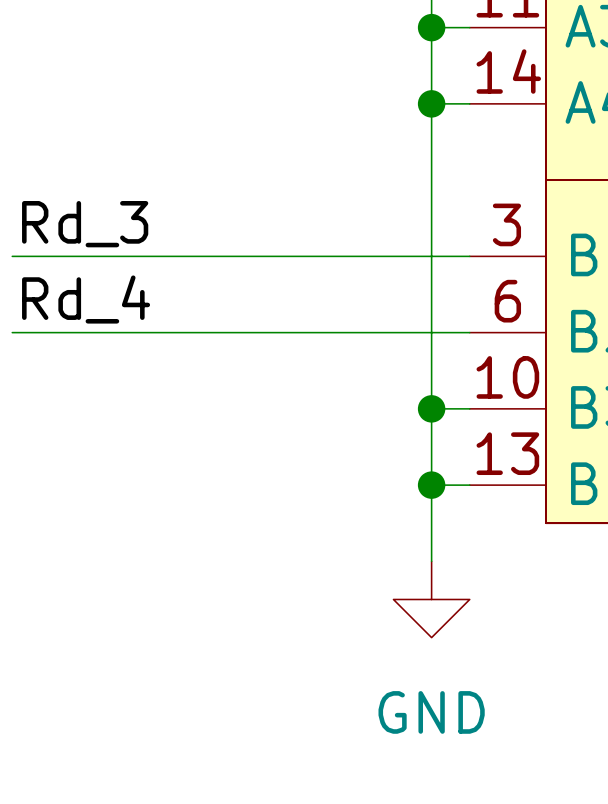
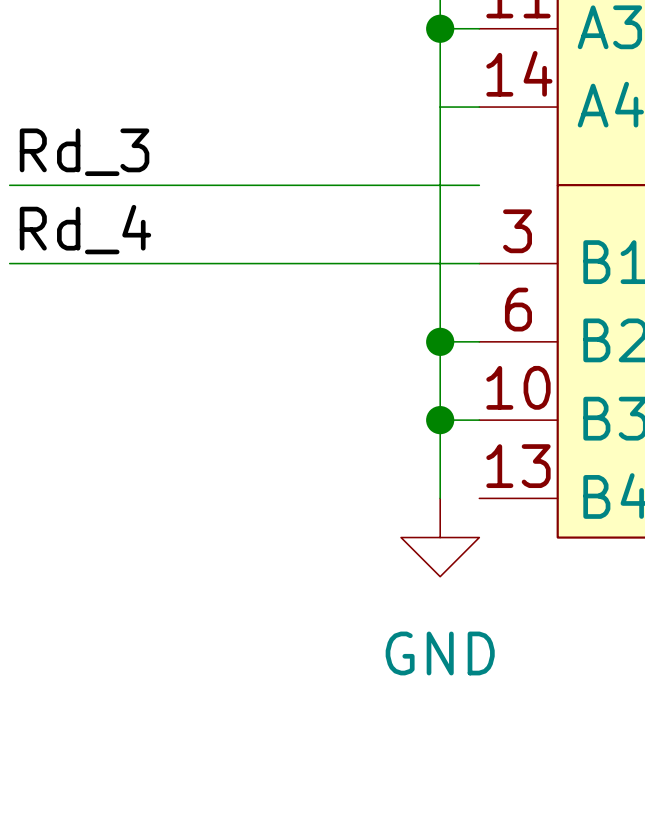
junction: (431, 103) -> none
label: none -> Rd_3 (84, 152)
wire: none -> (9, 185) (479, 185)
label: Rd_3 (85, 224) -> Rd_4 (85, 229)
label: Rd_4 (86, 299) -> none
wire: (12, 332) (431, 332) -> none
junction: none -> (440, 341)
junction: (431, 485) -> none
wire: (469, 485) (431, 485) (431, 561) -> none
power symbol position: GND (431, 599) -> GND (440, 537)

